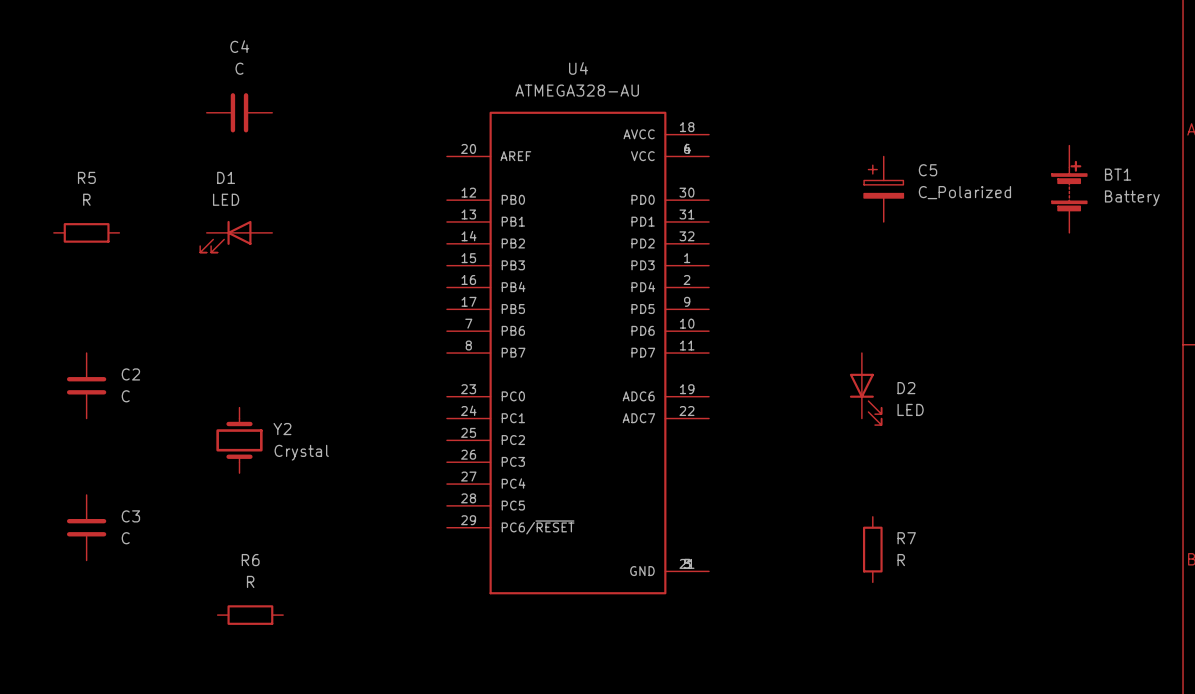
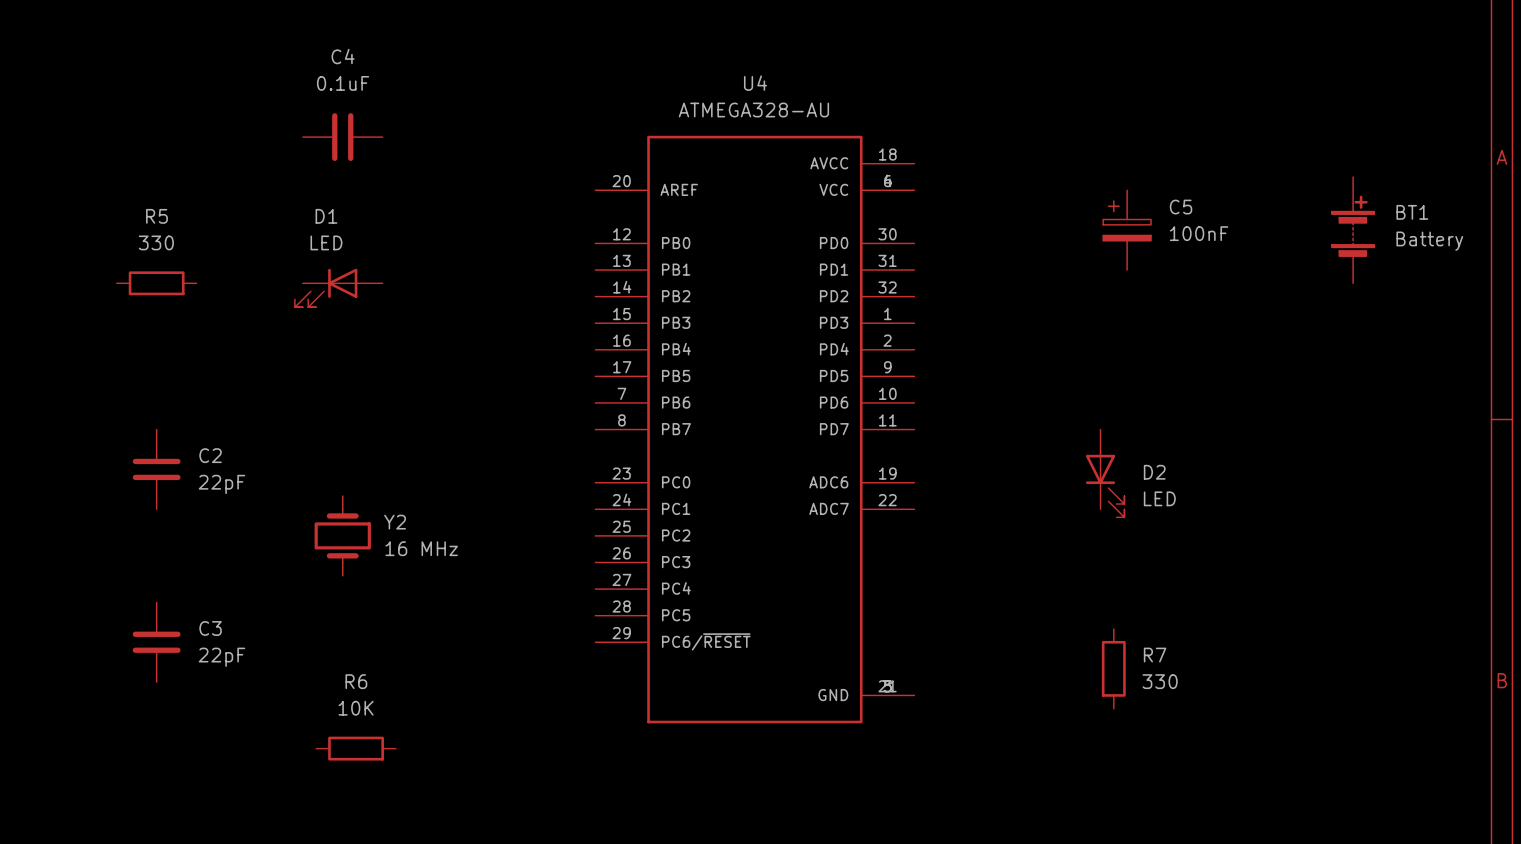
C4 value: C (239, 68) -> 0.1uF (343, 83)
C5 value: C_Polarized (964, 192) -> 100nF (1199, 233)
R5 value: R (86, 199) -> 330 (156, 242)
C2 value: C (125, 396) -> 22pF (221, 484)
Y2 value: Crystal (301, 452) -> 16 MHz (421, 548)
C3 value: C (125, 538) -> 22pF (221, 657)
R7 value: R (901, 560) -> 330 (1160, 681)
R6 value: R (250, 581) -> 10K (356, 708)

